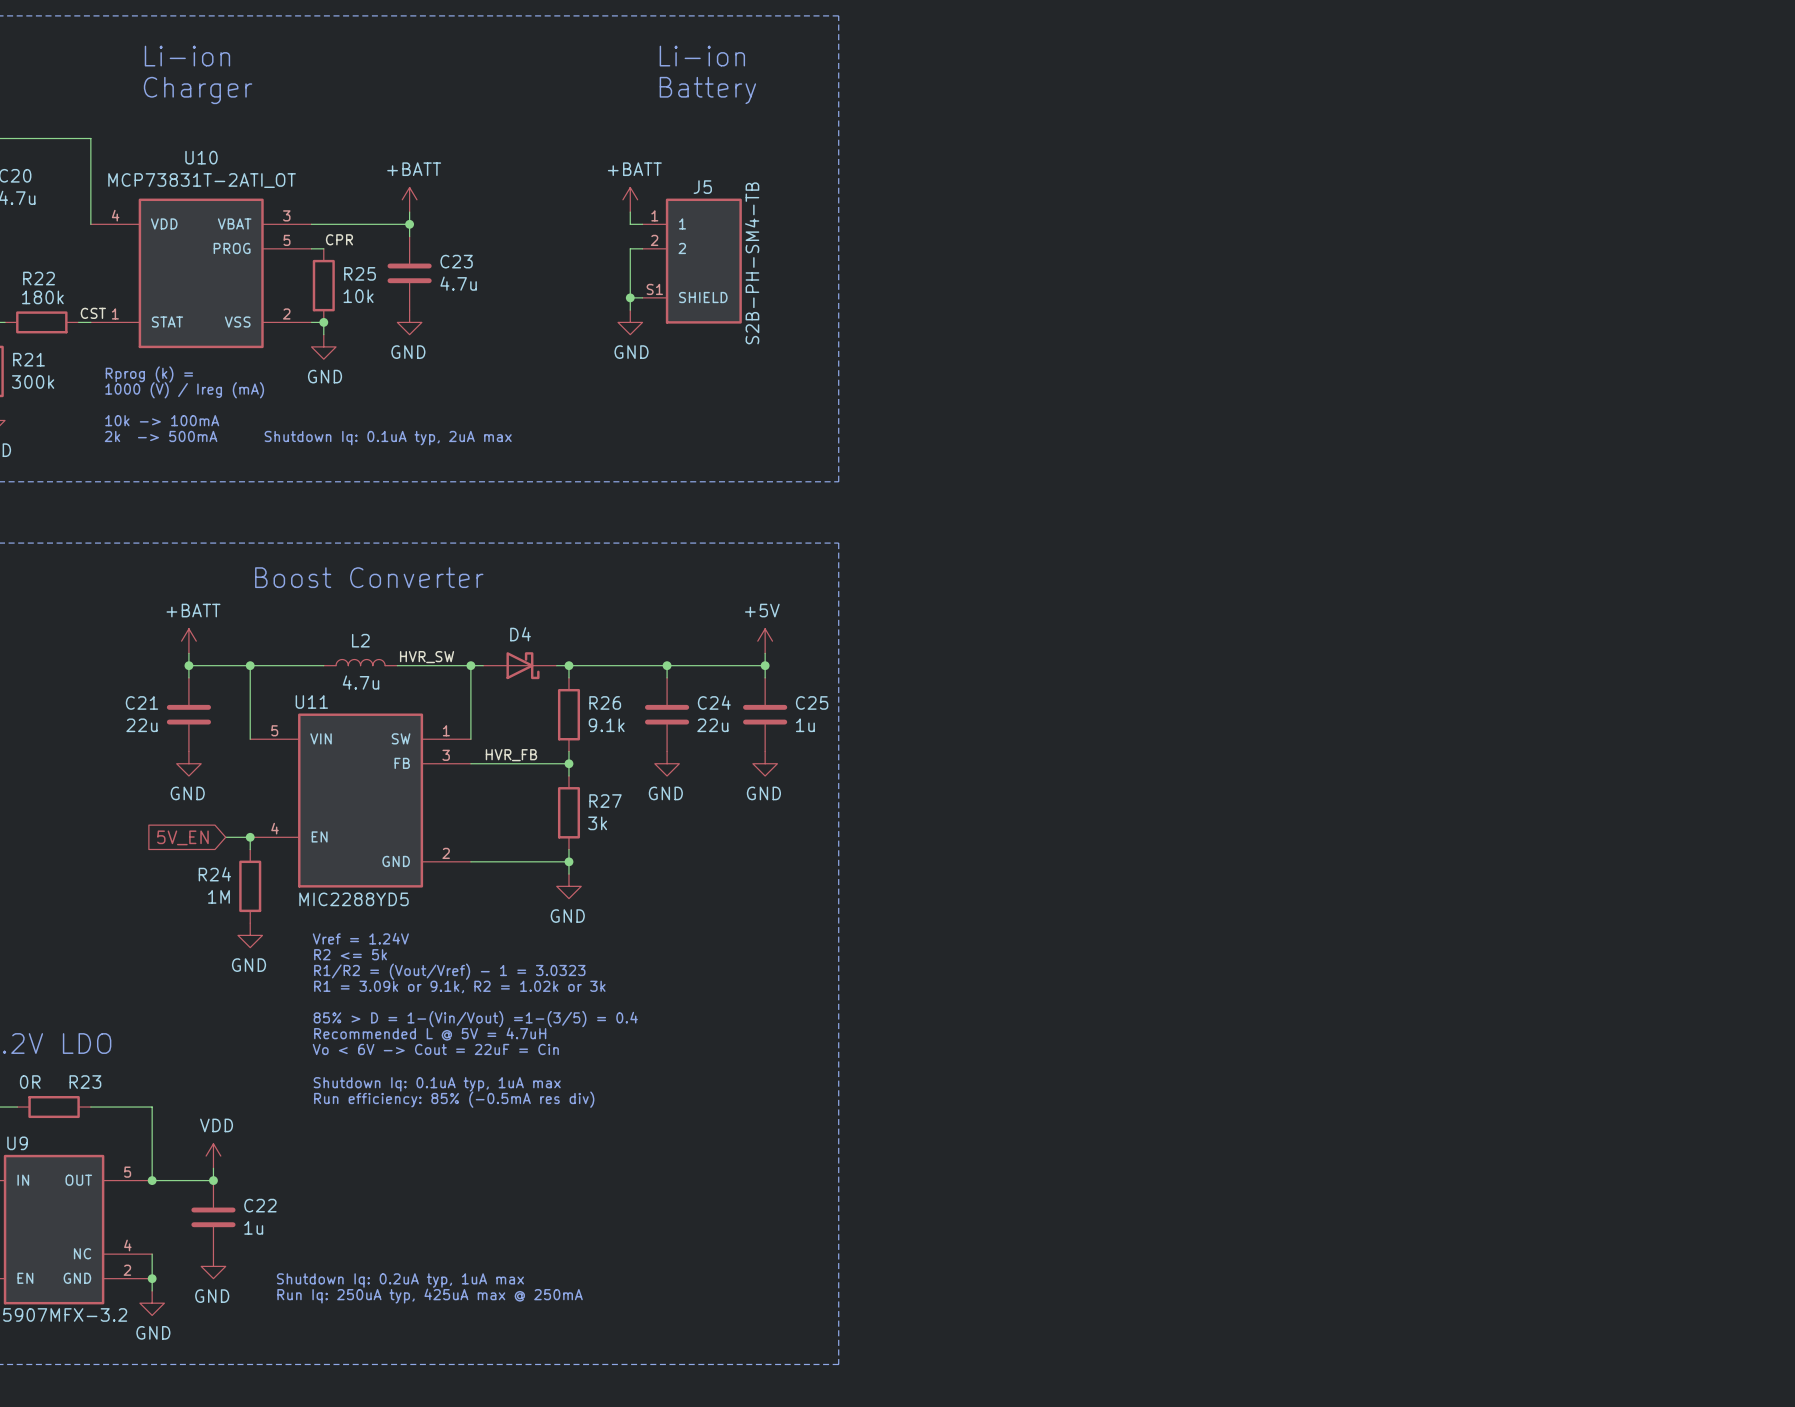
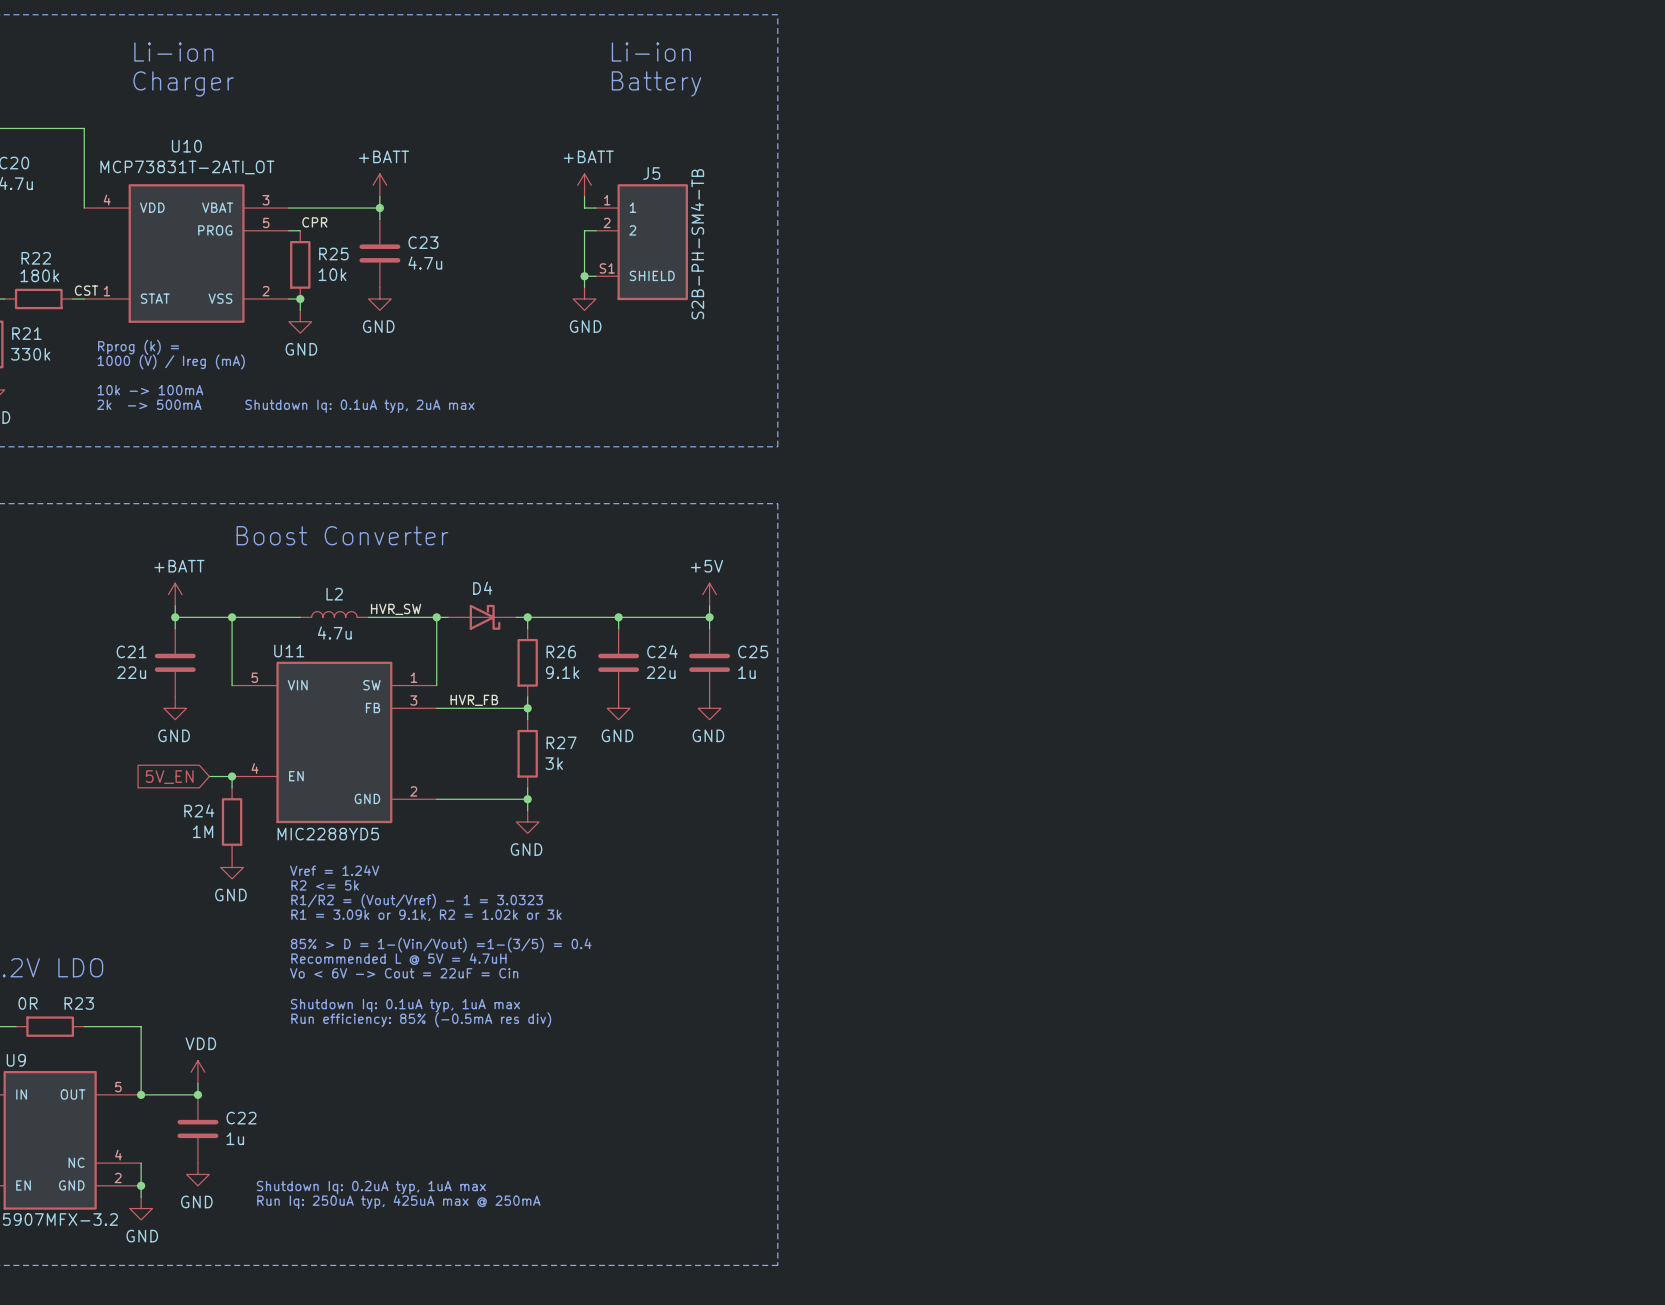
R21 value: 300k (33, 382) -> 330k (30, 354)

